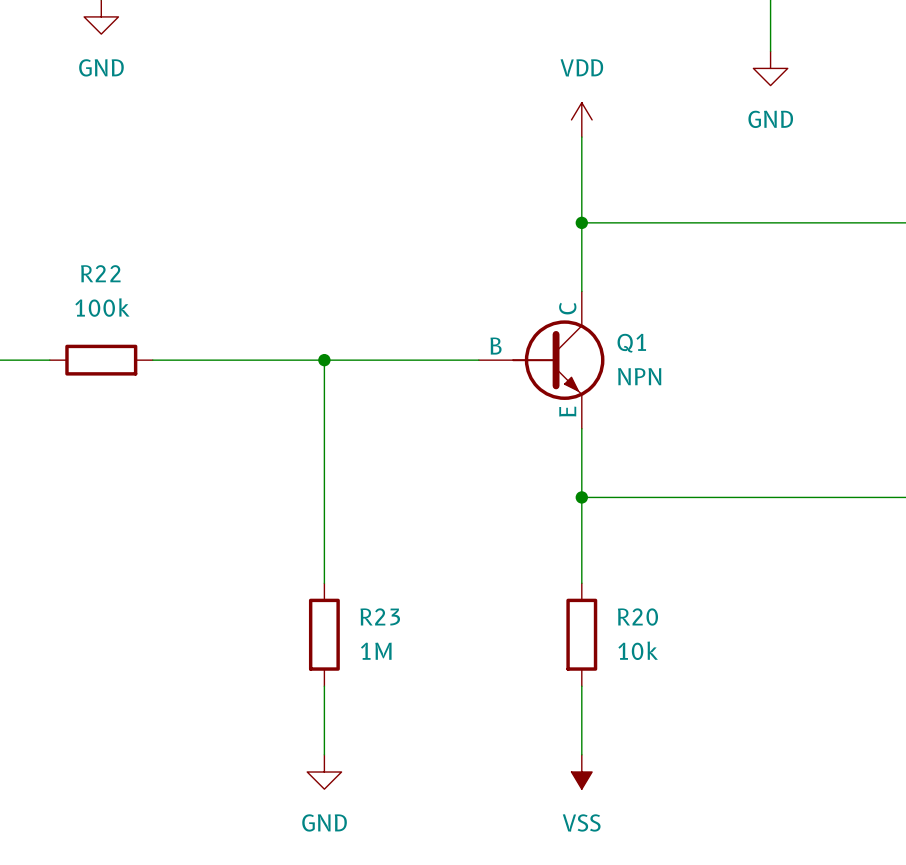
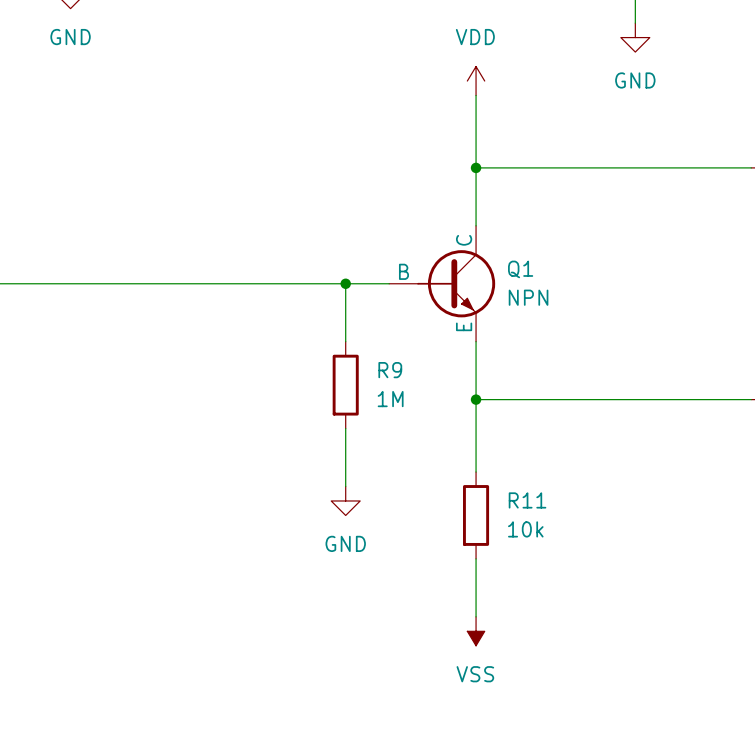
wire: none -> (27, 283) (114, 283)
R22: 100k (101, 360) -> none
wire: (324, 360) (324, 583) -> none
junction: (324, 360) -> none
wire: none -> (345, 283) (345, 341)
junction: none -> (345, 283)
R9: none -> 1M (345, 385)
R20 name: R20 (637, 617) -> R11 (527, 500)
R23: 1M (324, 634) -> none
wire: (324, 686) (324, 754) -> (345, 428) (345, 486)
power symbol position: GND (324, 772) -> GND (345, 500)

